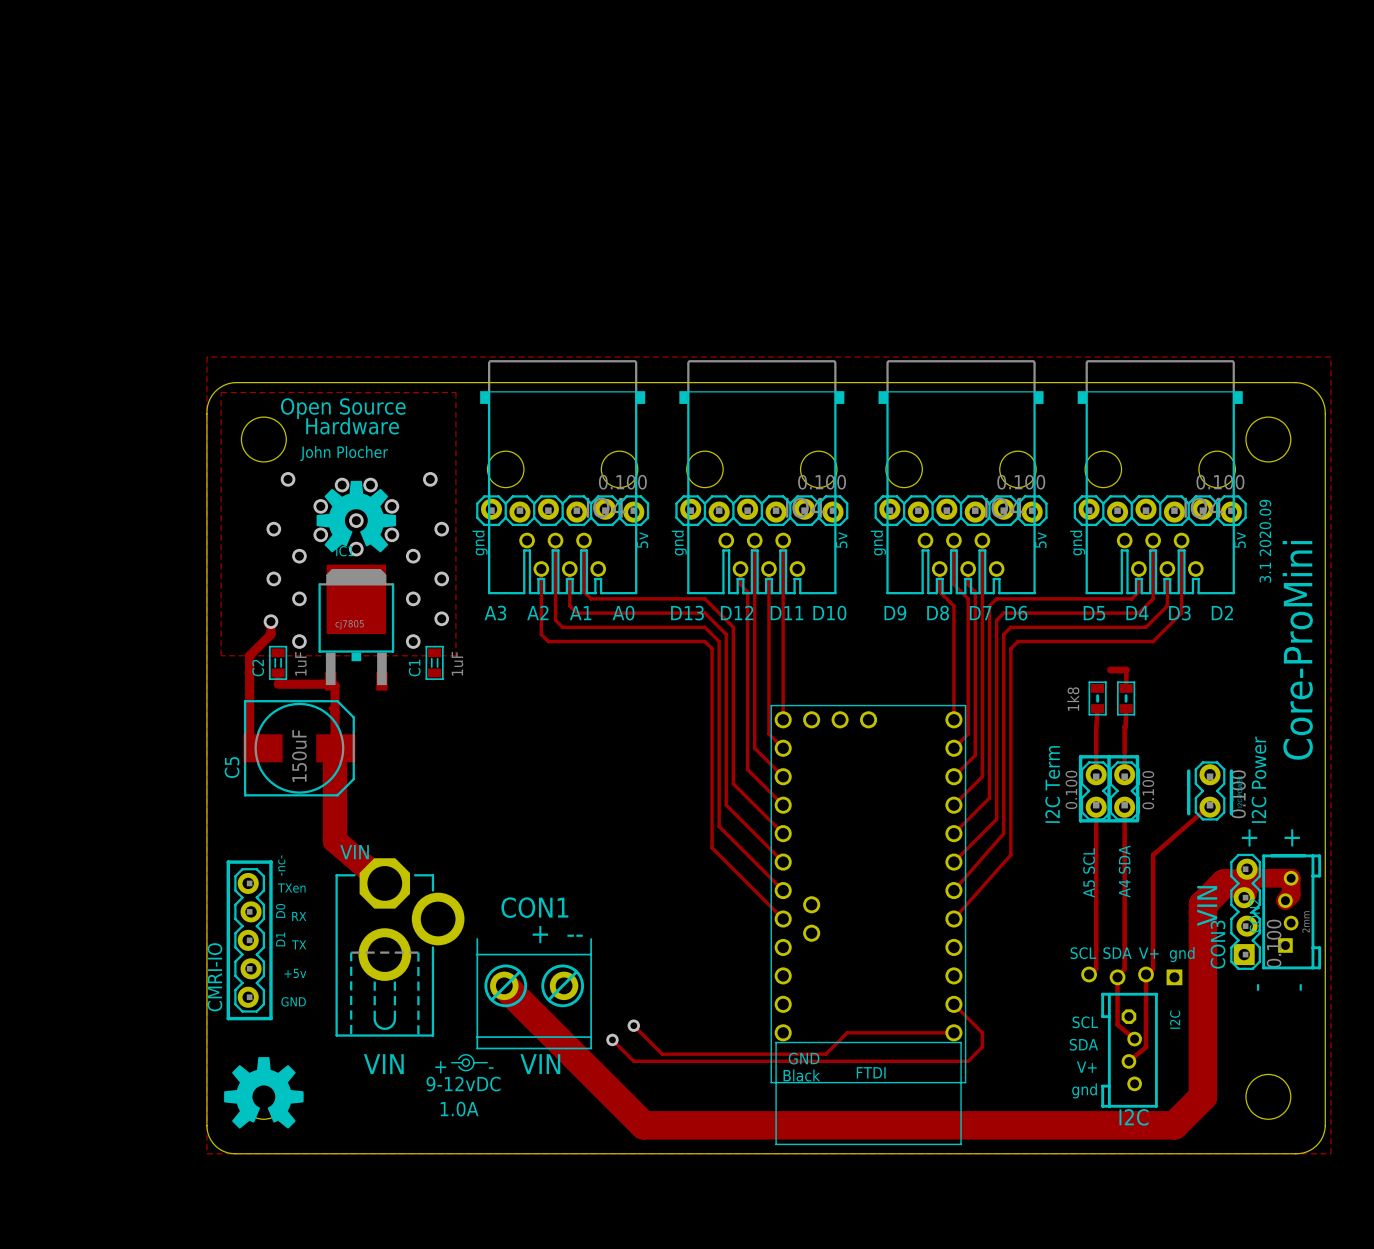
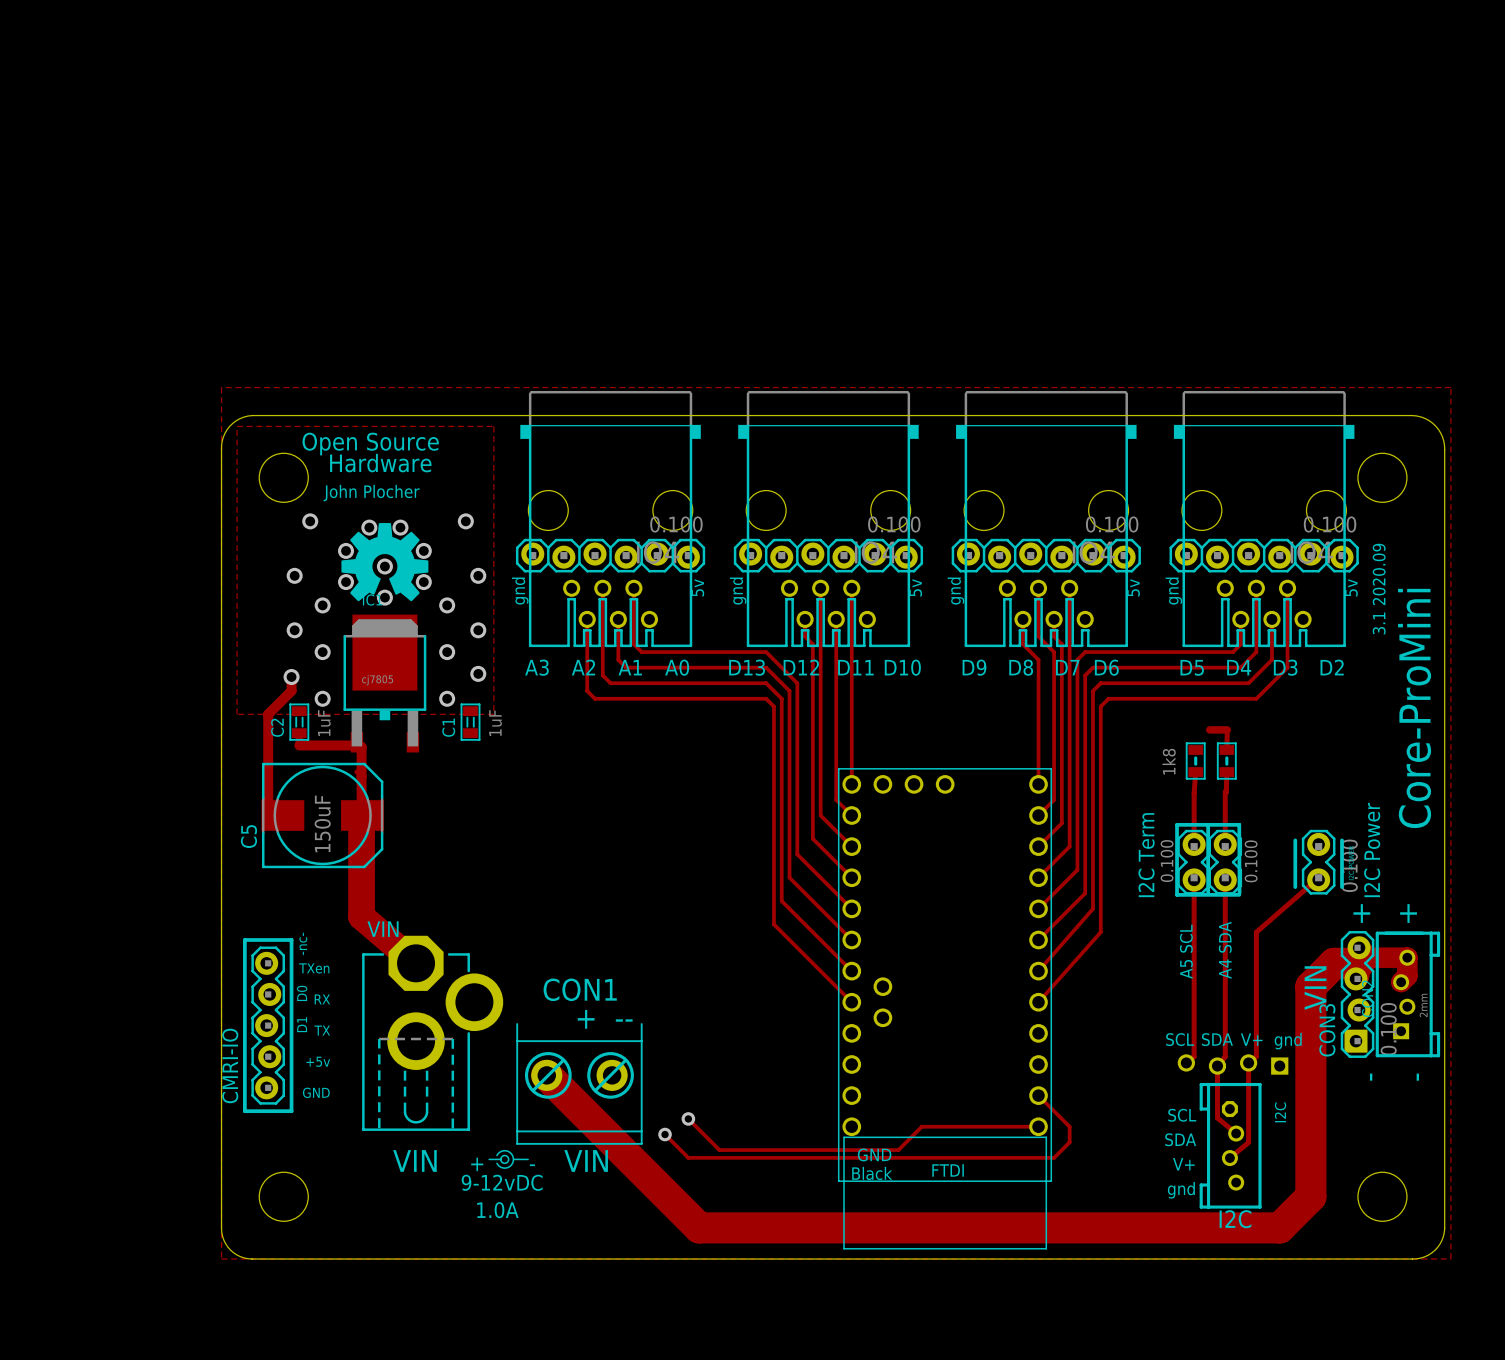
drawing: [224, 1057, 304, 1129] -> none

